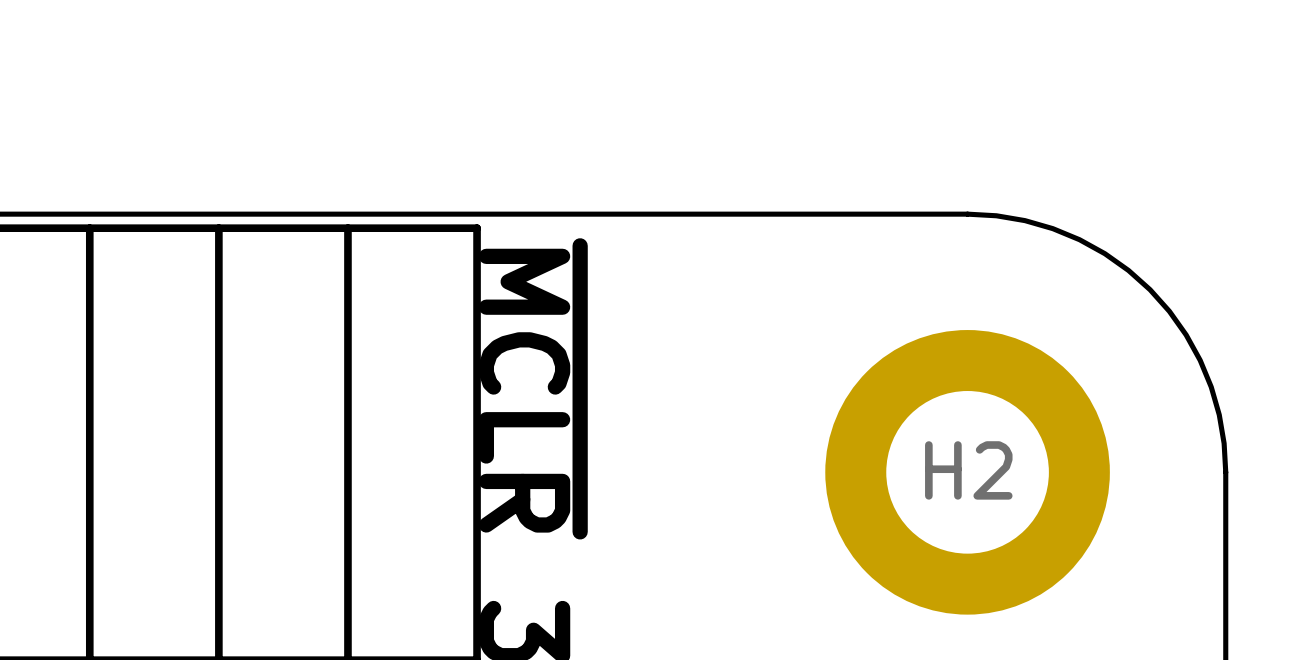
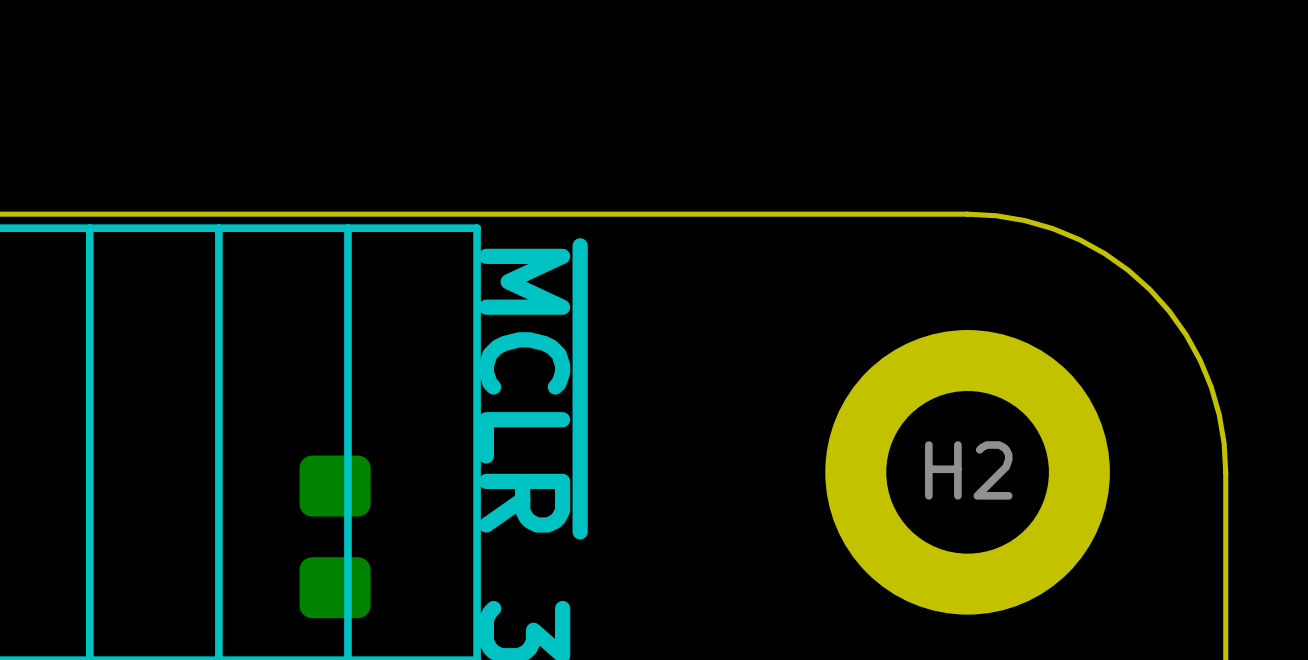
part: none -> (335, 536)

